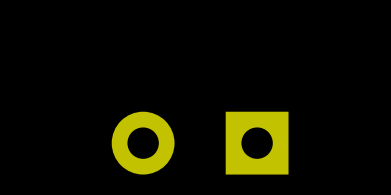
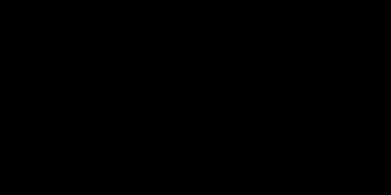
part: (200, 143) -> none

